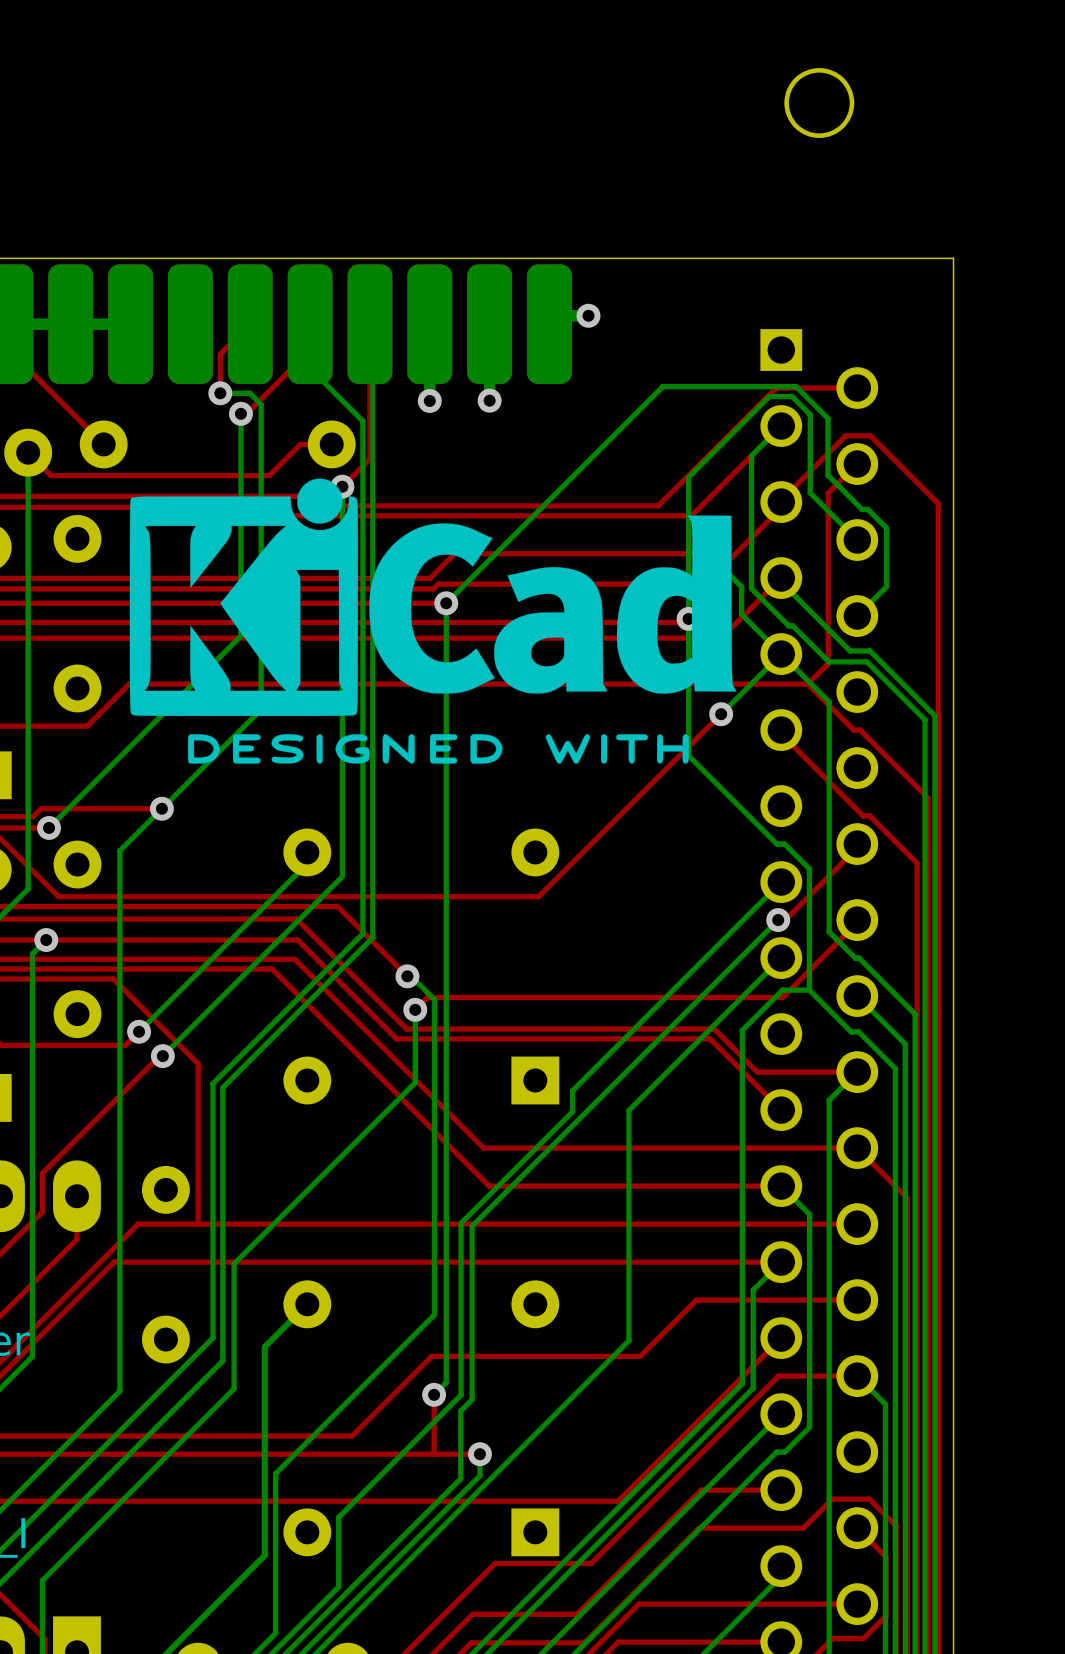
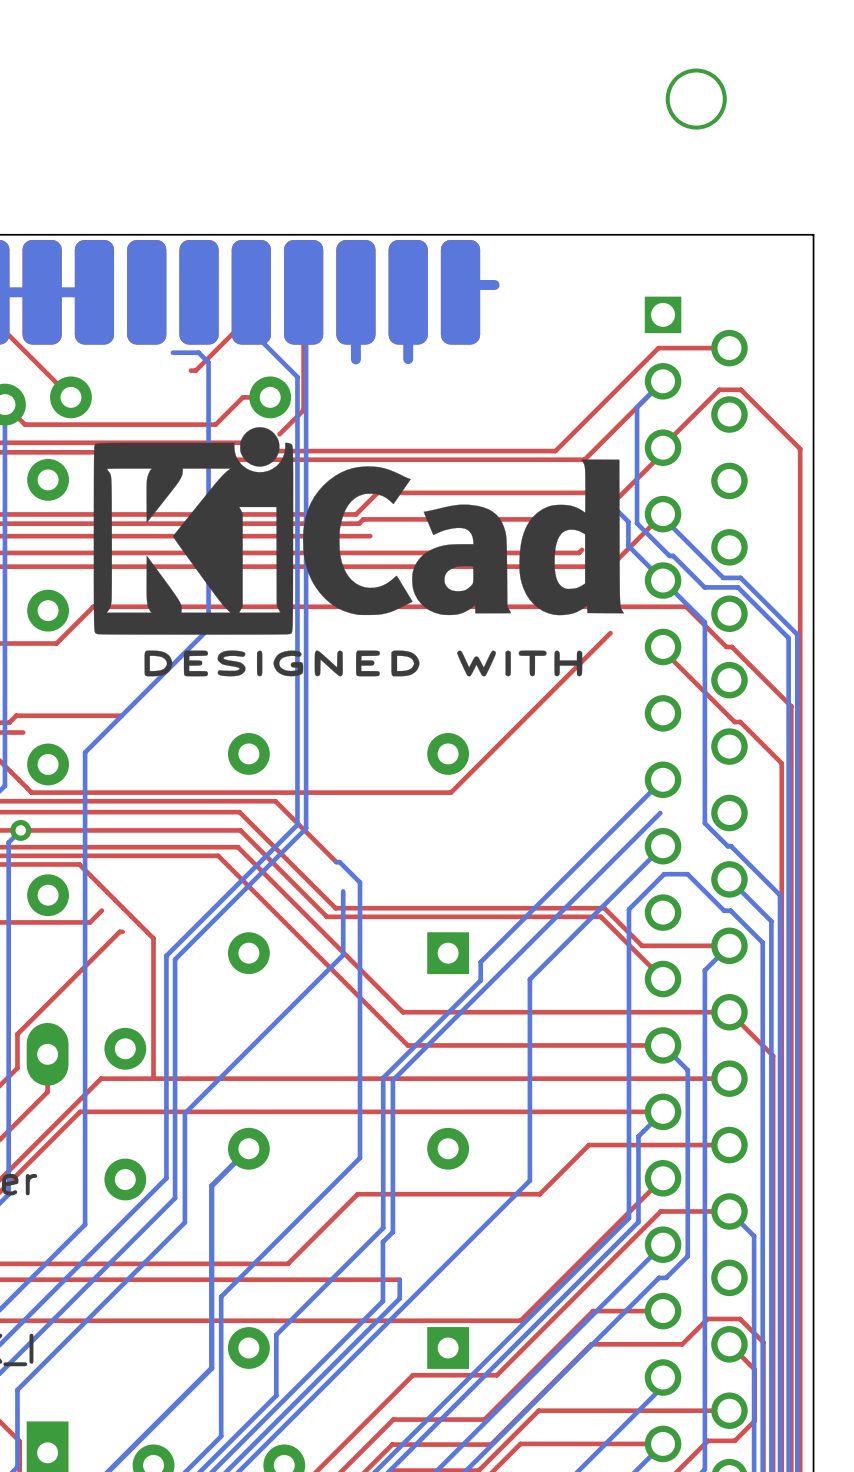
via: (588, 315) -> none
top track: (250, 324) (220, 354) (220, 393) -> none
via: (220, 393) -> none
via: (429, 400) -> none
via: (489, 400) -> none
bottom track: (240, 413) (240, 636) (49, 827) -> none
via: (240, 413) -> none
top track: (857, 464) (828, 493) (828, 663) (807, 684) -> none
bottom track: (342, 486) (342, 876) (162, 1056) -> none
via: (342, 486) -> none
bottom track: (857, 540) (810, 493) (810, 414) (792, 396) (769, 396) (688, 477) (688, 755) (776, 844) (784, 844) (809, 868) (809, 990) -> none
via: (446, 603) -> none
bottom track: (857, 616) (886, 586) (886, 528) (867, 509) (862, 509) (827, 475) (827, 418) (796, 386) (662, 386) (446, 603) (446, 1382) (434, 1394) -> none
via: (688, 618) -> none
bottom track: (781, 654) (721, 714) -> none
via: (721, 714) -> none
via: (161, 808) -> none
via: (49, 827) -> none
top track: (857, 844) (857, 847) (785, 920) (778, 920) -> none
bottom track: (307, 852) (307, 863) (139, 1031) -> none
via: (778, 920) -> none
top track: (857, 920) (857, 922) (782, 997) (427, 997) (415, 1009) -> none
via: (407, 976) -> none
via: (415, 1009) -> none
via: (139, 1031) -> none
via: (162, 1056) -> none
top track: (434, 1394) (434, 1454) -> none
via: (434, 1394) -> none
via: (479, 1454) -> none

